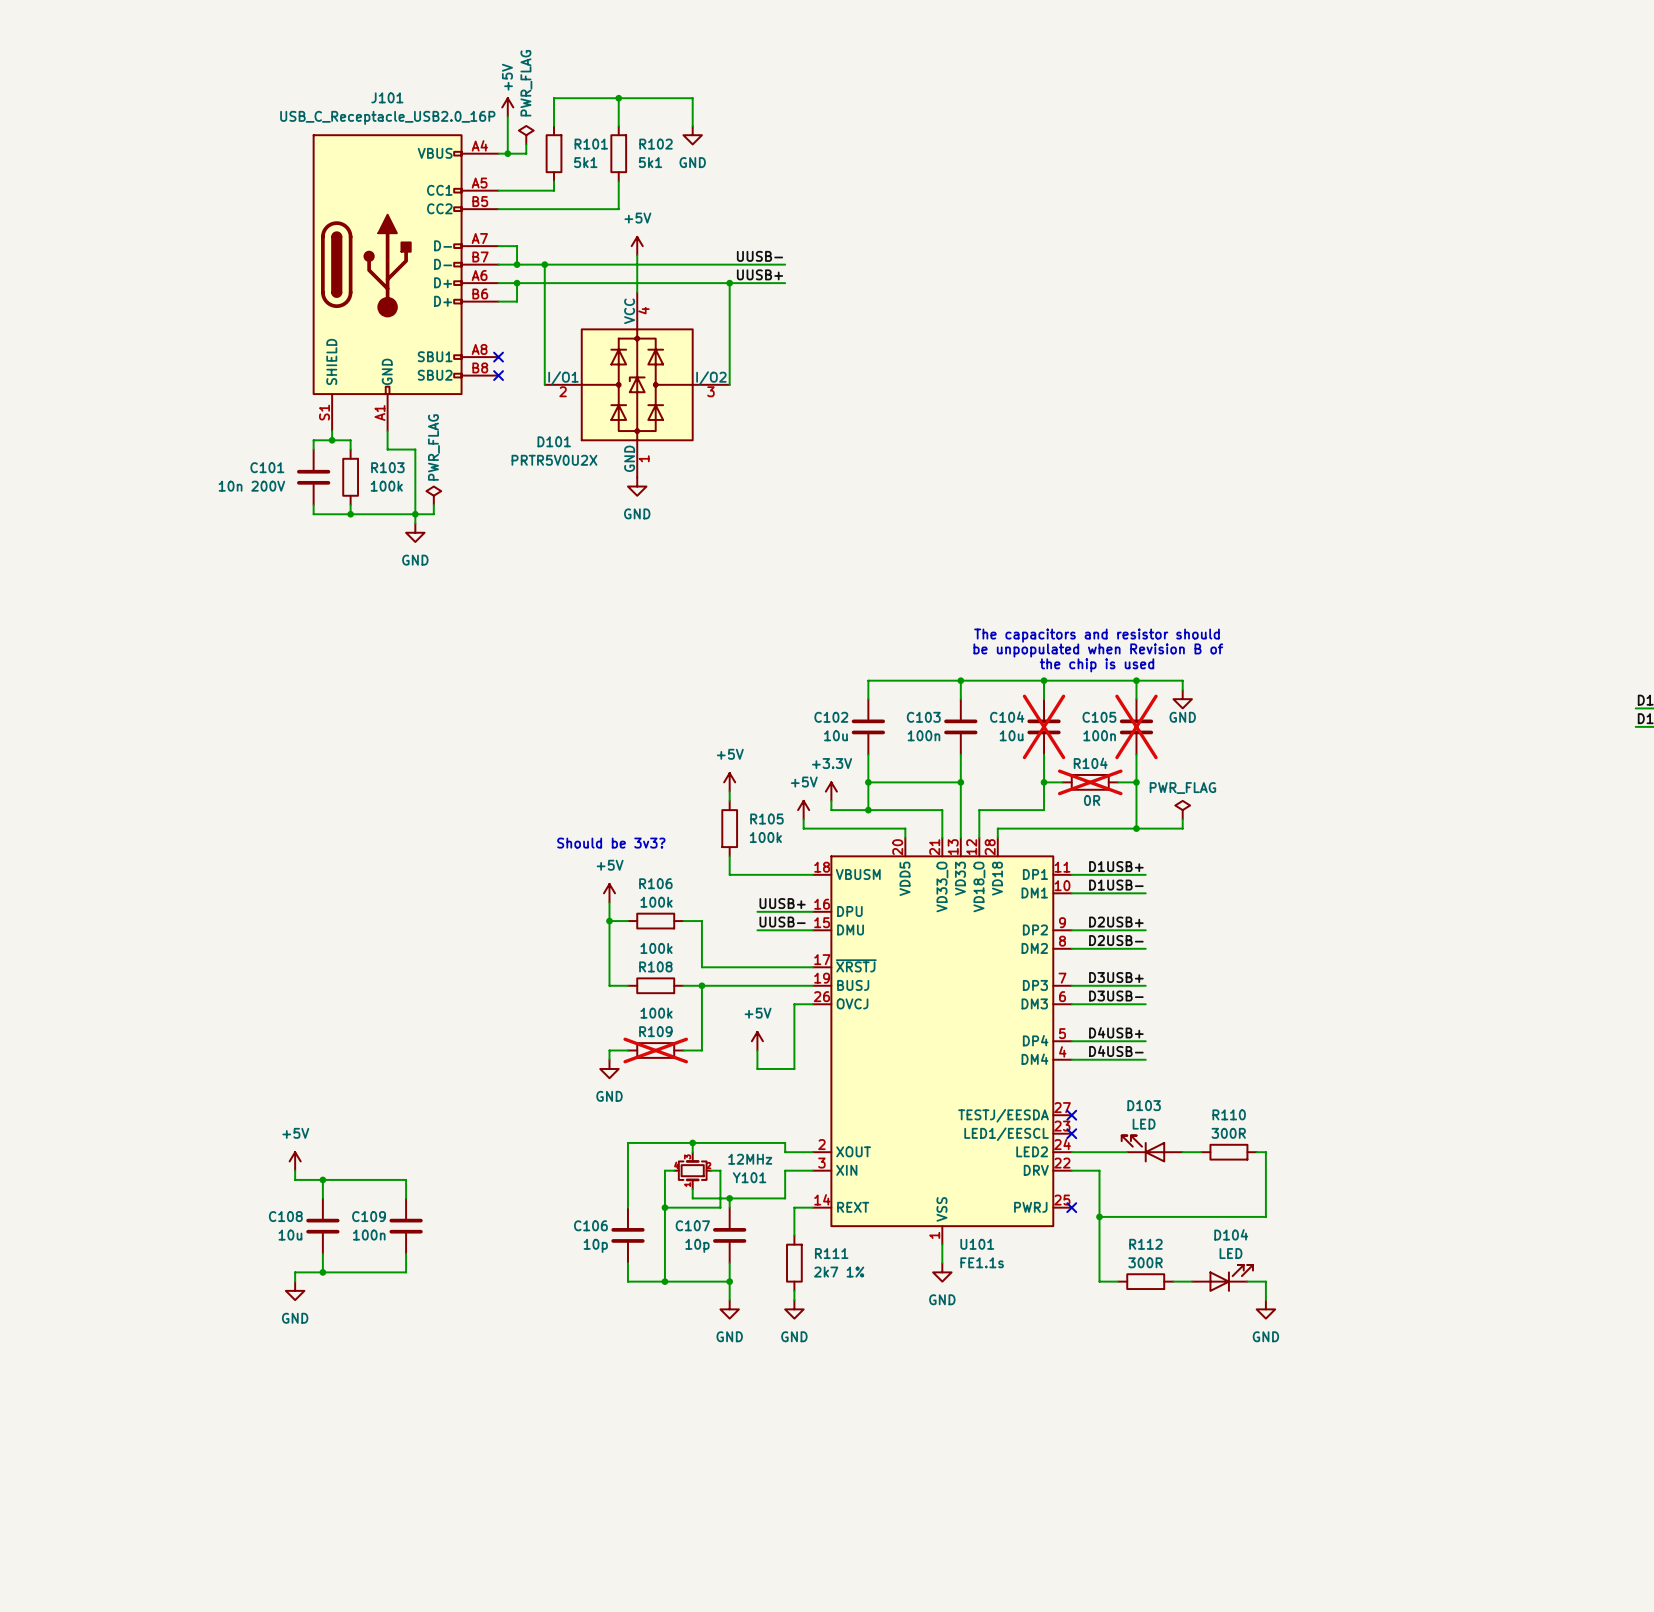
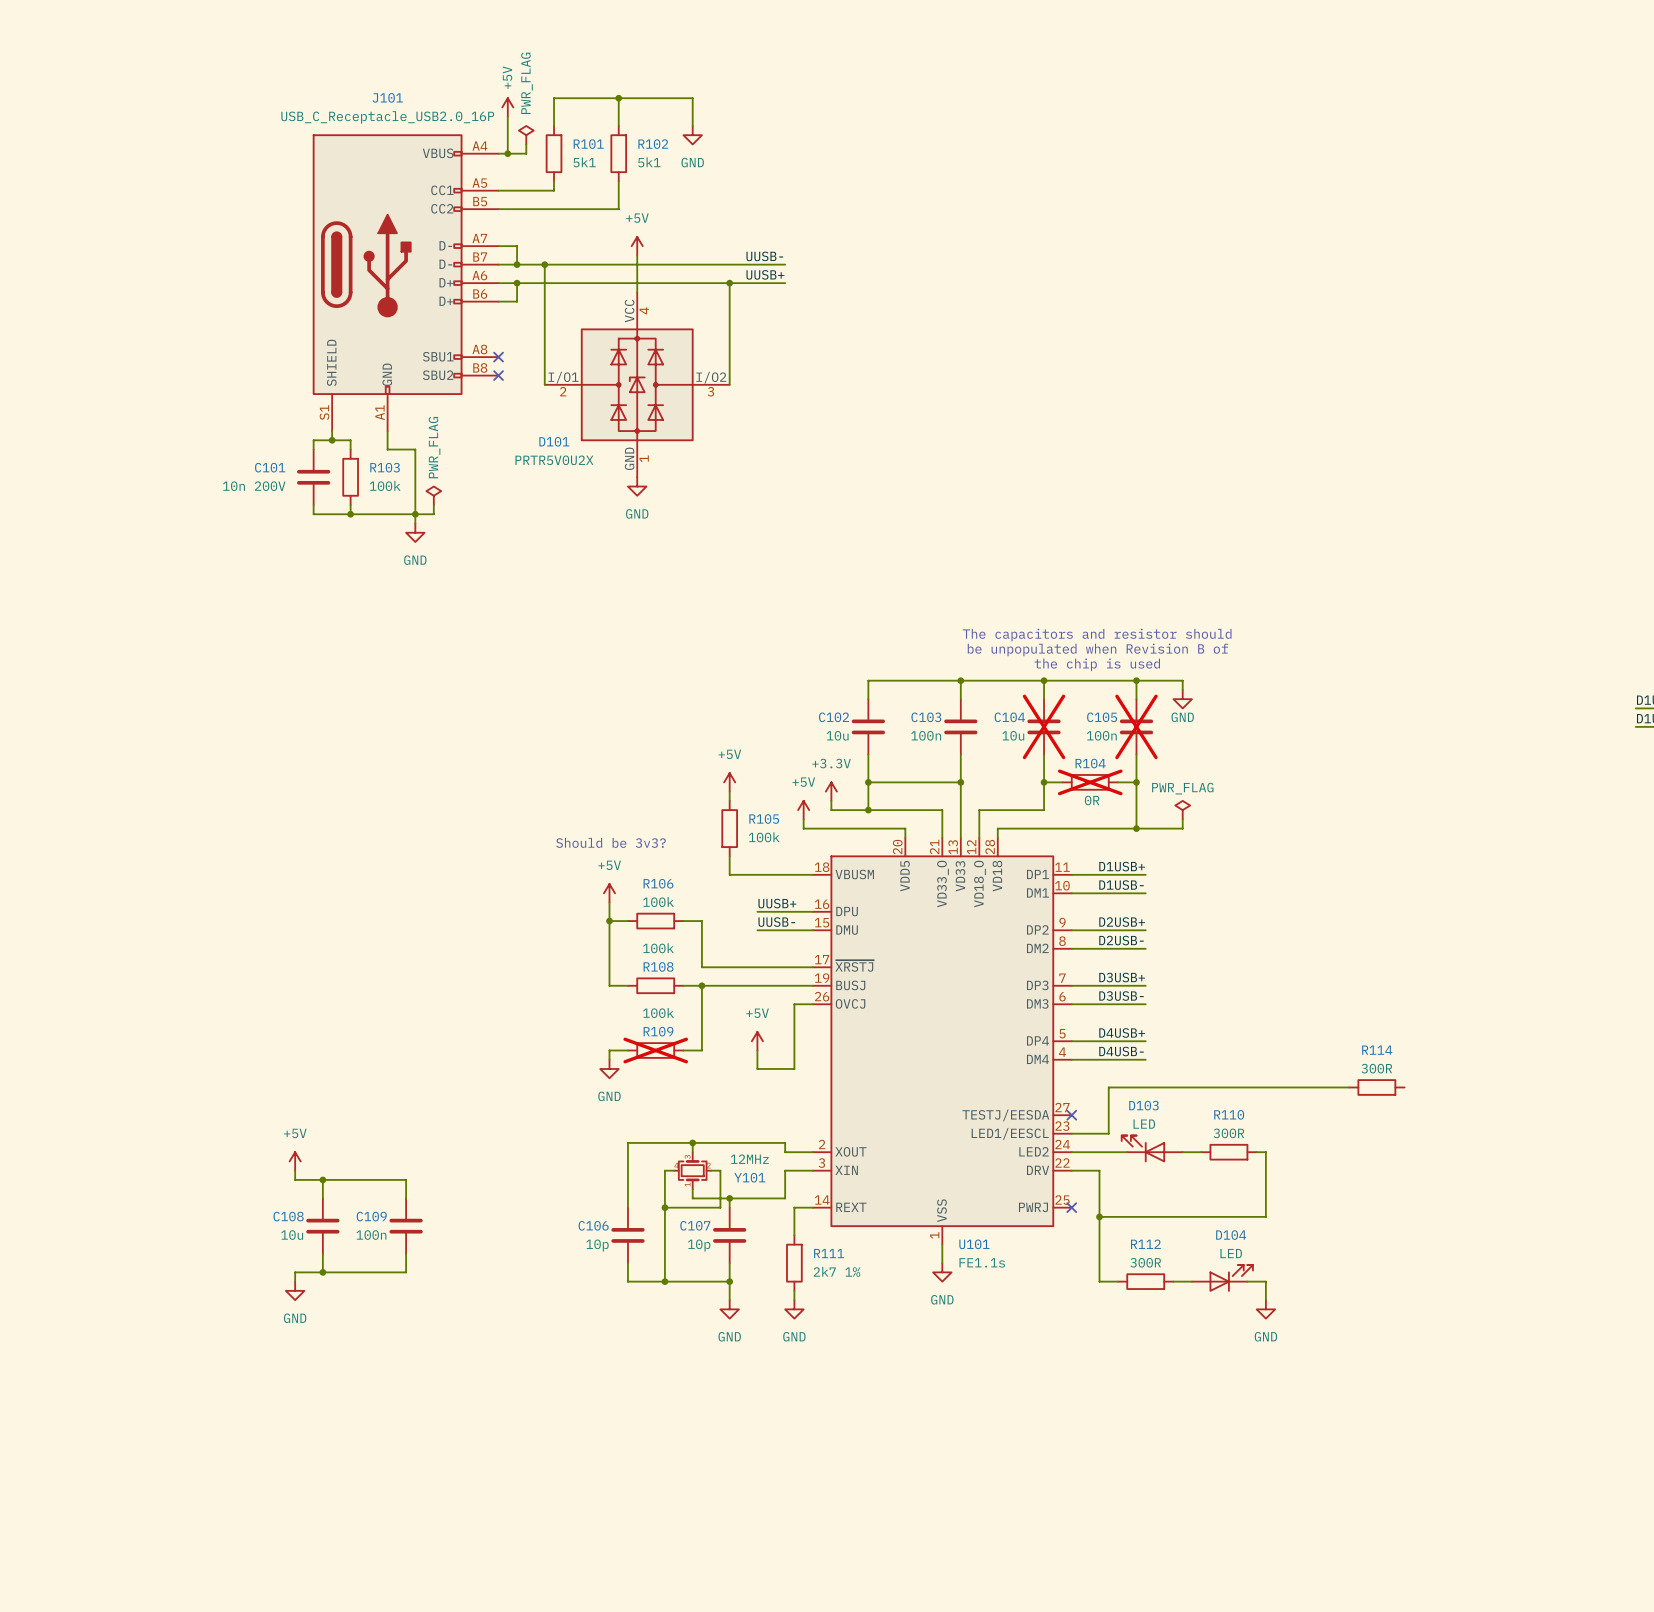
wire: none -> (1349, 1087) (1108, 1087) (1108, 1133) (1071, 1133)
R114: none -> 300R (1376, 1087)
no-connect mark: (1071, 1133) -> none

